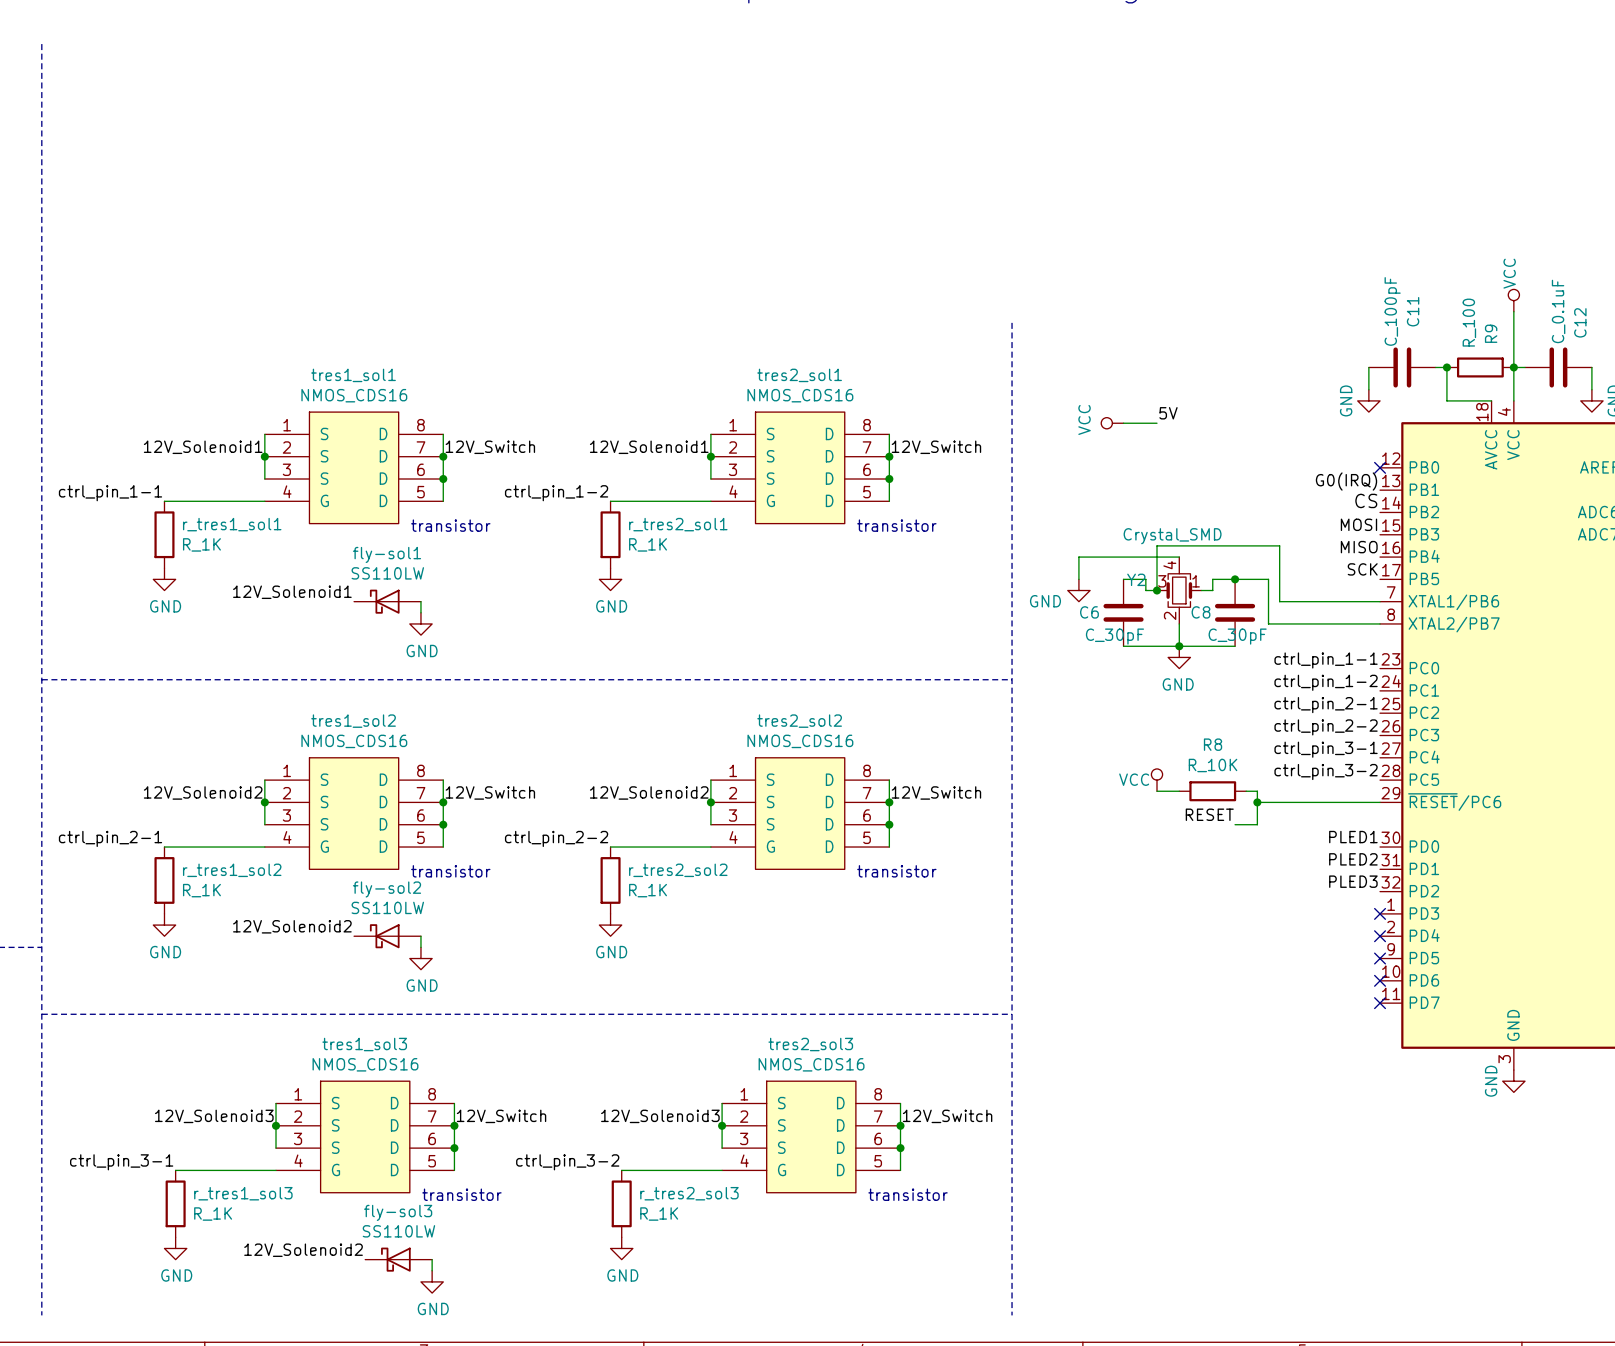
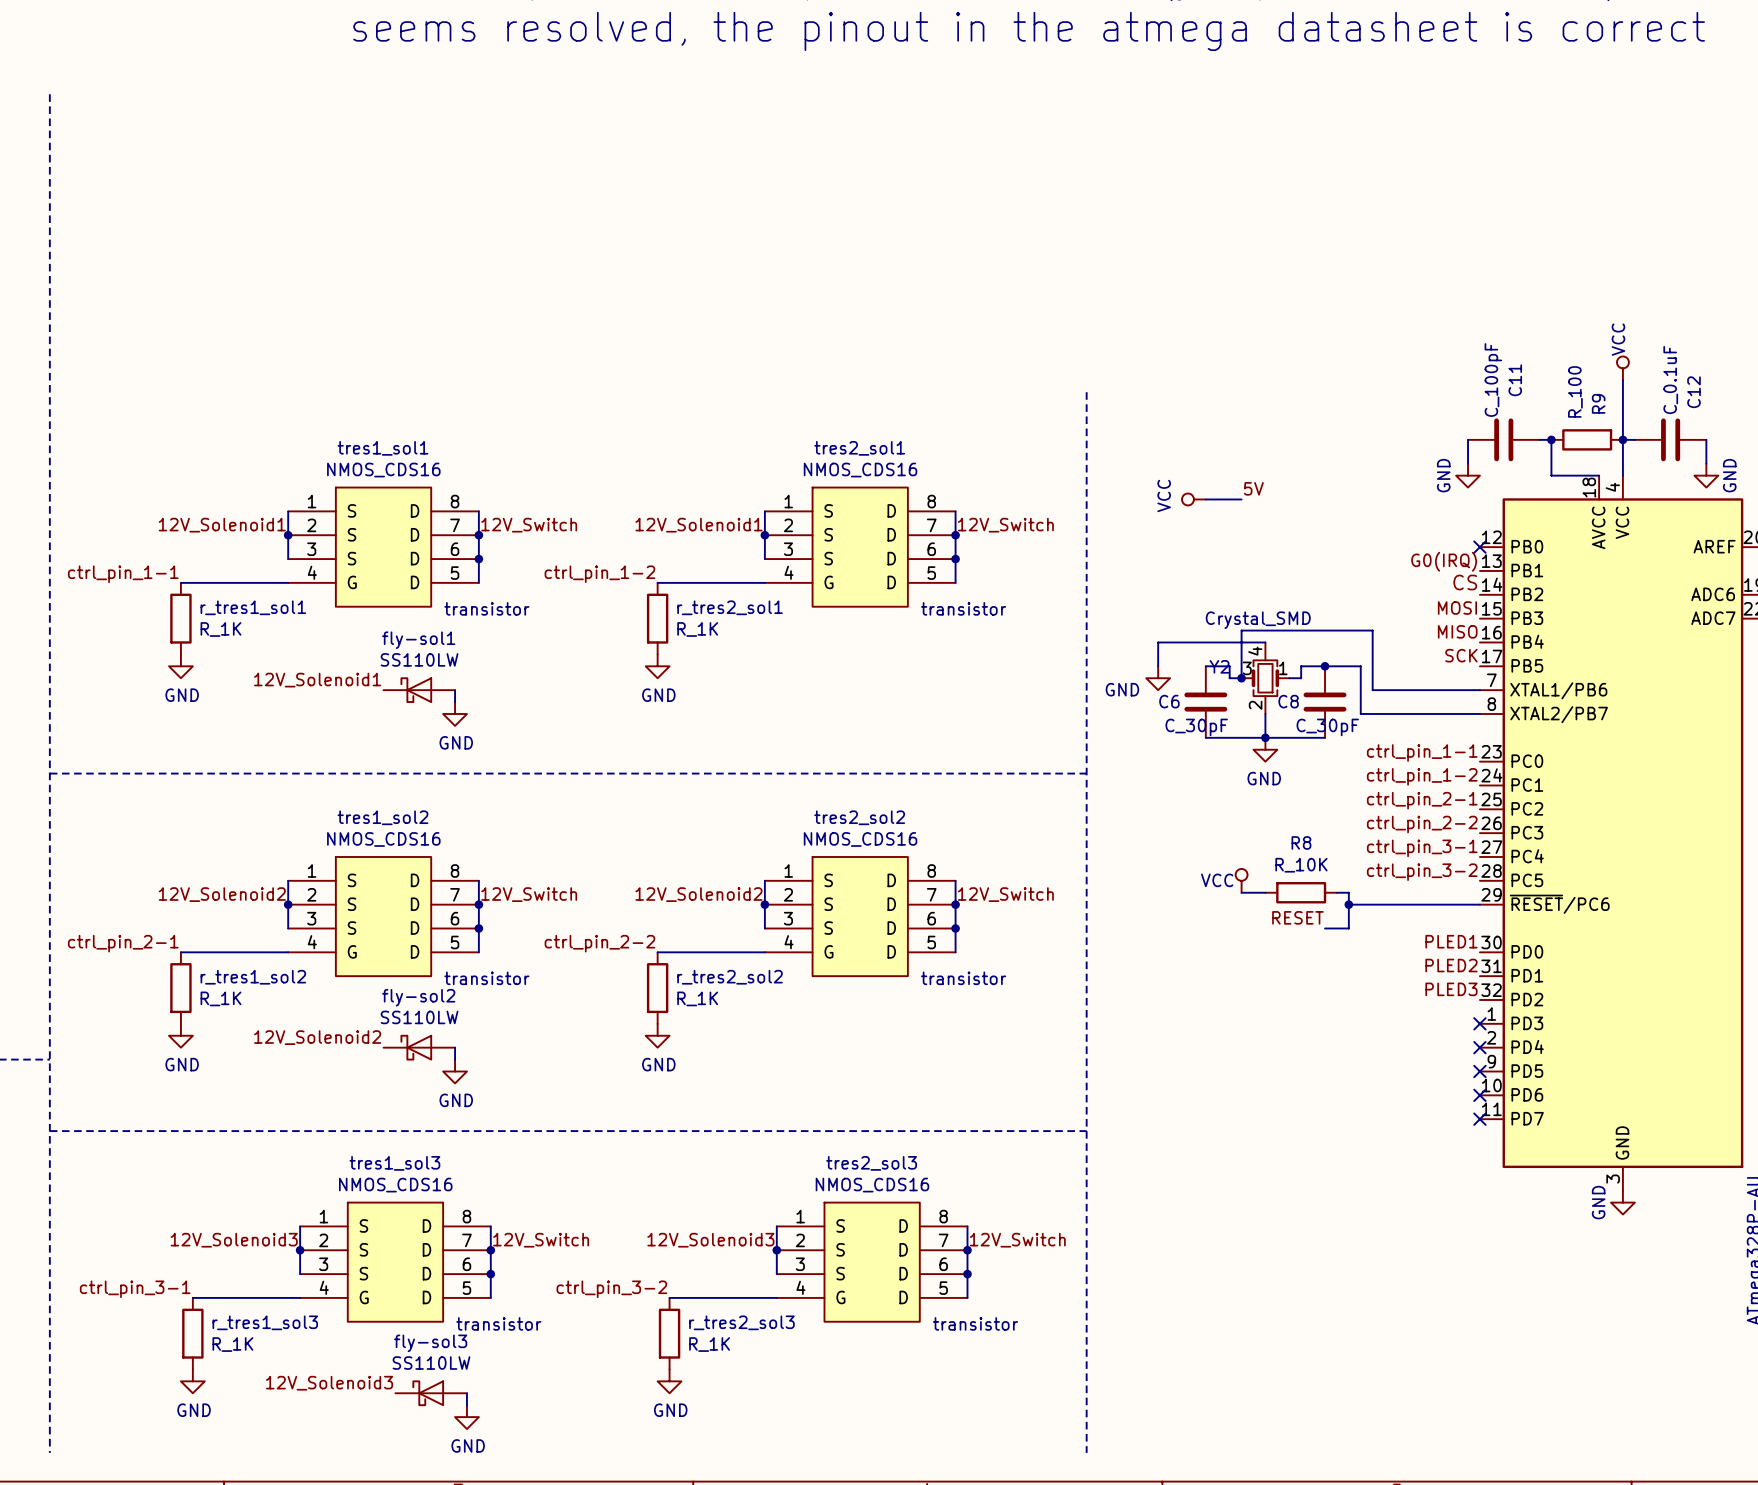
label: 12V_Solenoid2 (303, 1250) -> 12V_Solenoid3 (329, 1383)

